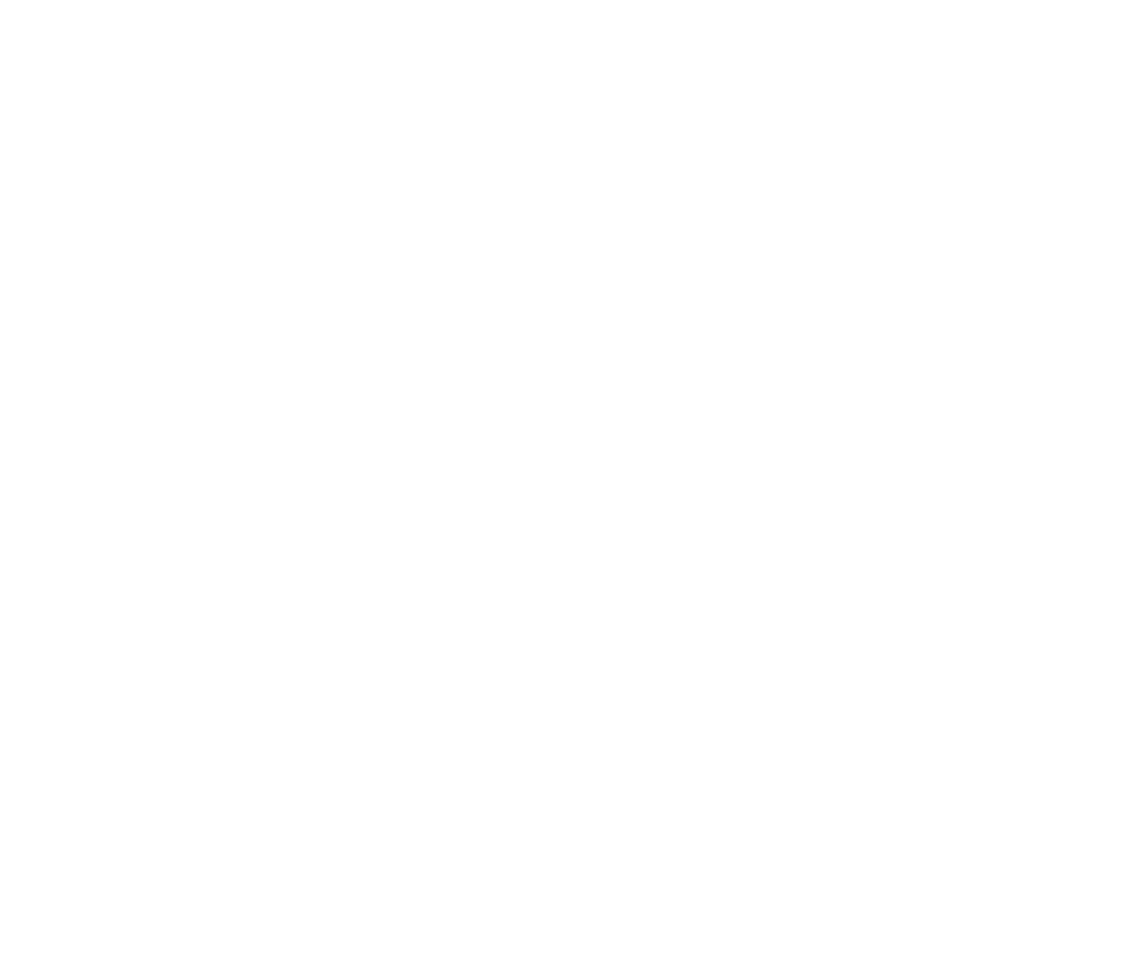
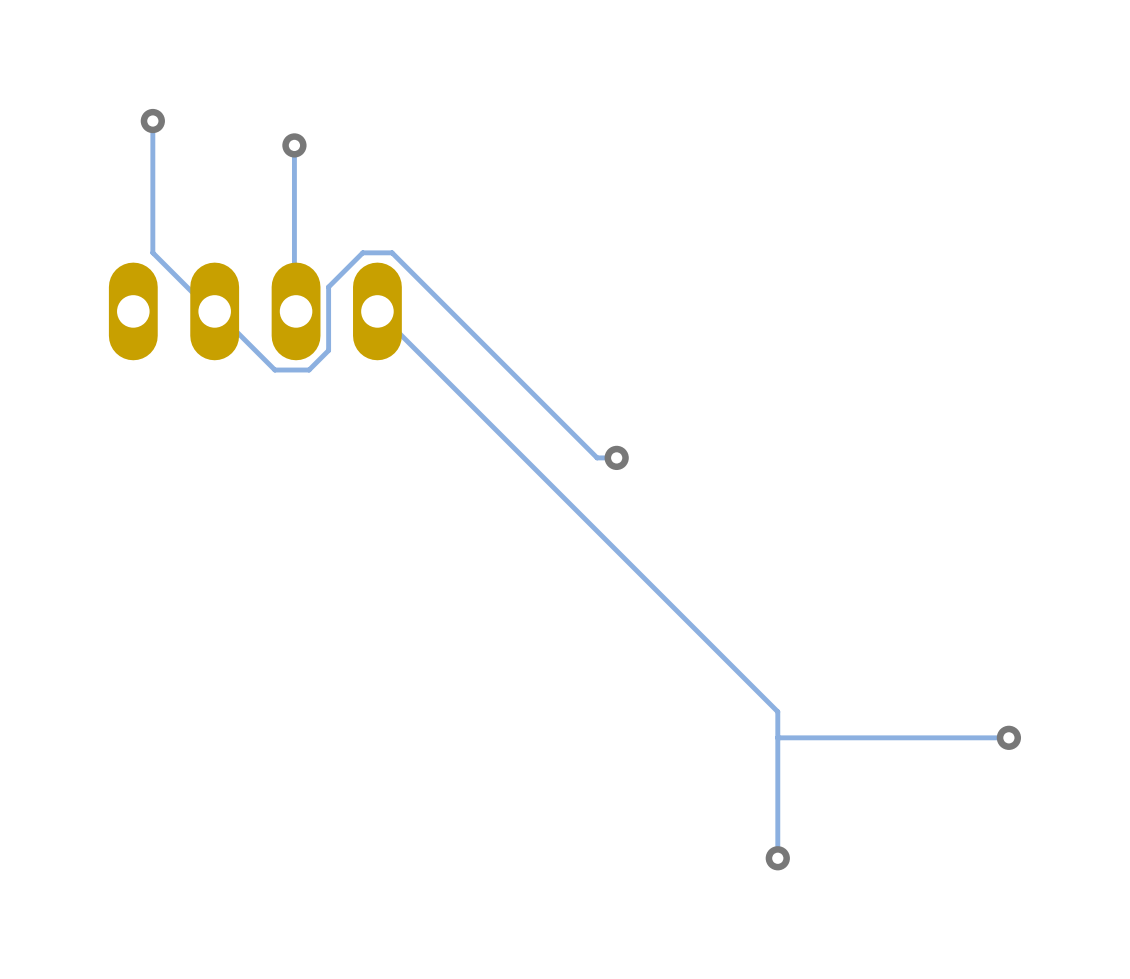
track: none -> (152, 121) (152, 252) (211, 311) (216, 311) (274, 370) (309, 370) (328, 350) (328, 287) (362, 252) (392, 252) (597, 457) (616, 457)
via: none -> (152, 121)
track: none -> (294, 145) (294, 311) (296, 311)
via: none -> (294, 145)
part: none -> (255, 311)
track: none -> (377, 311) (777, 711) (777, 858)
via: none -> (616, 457)
track: none -> (1008, 737) (777, 737)
via: none -> (1008, 737)
via: none -> (777, 858)

